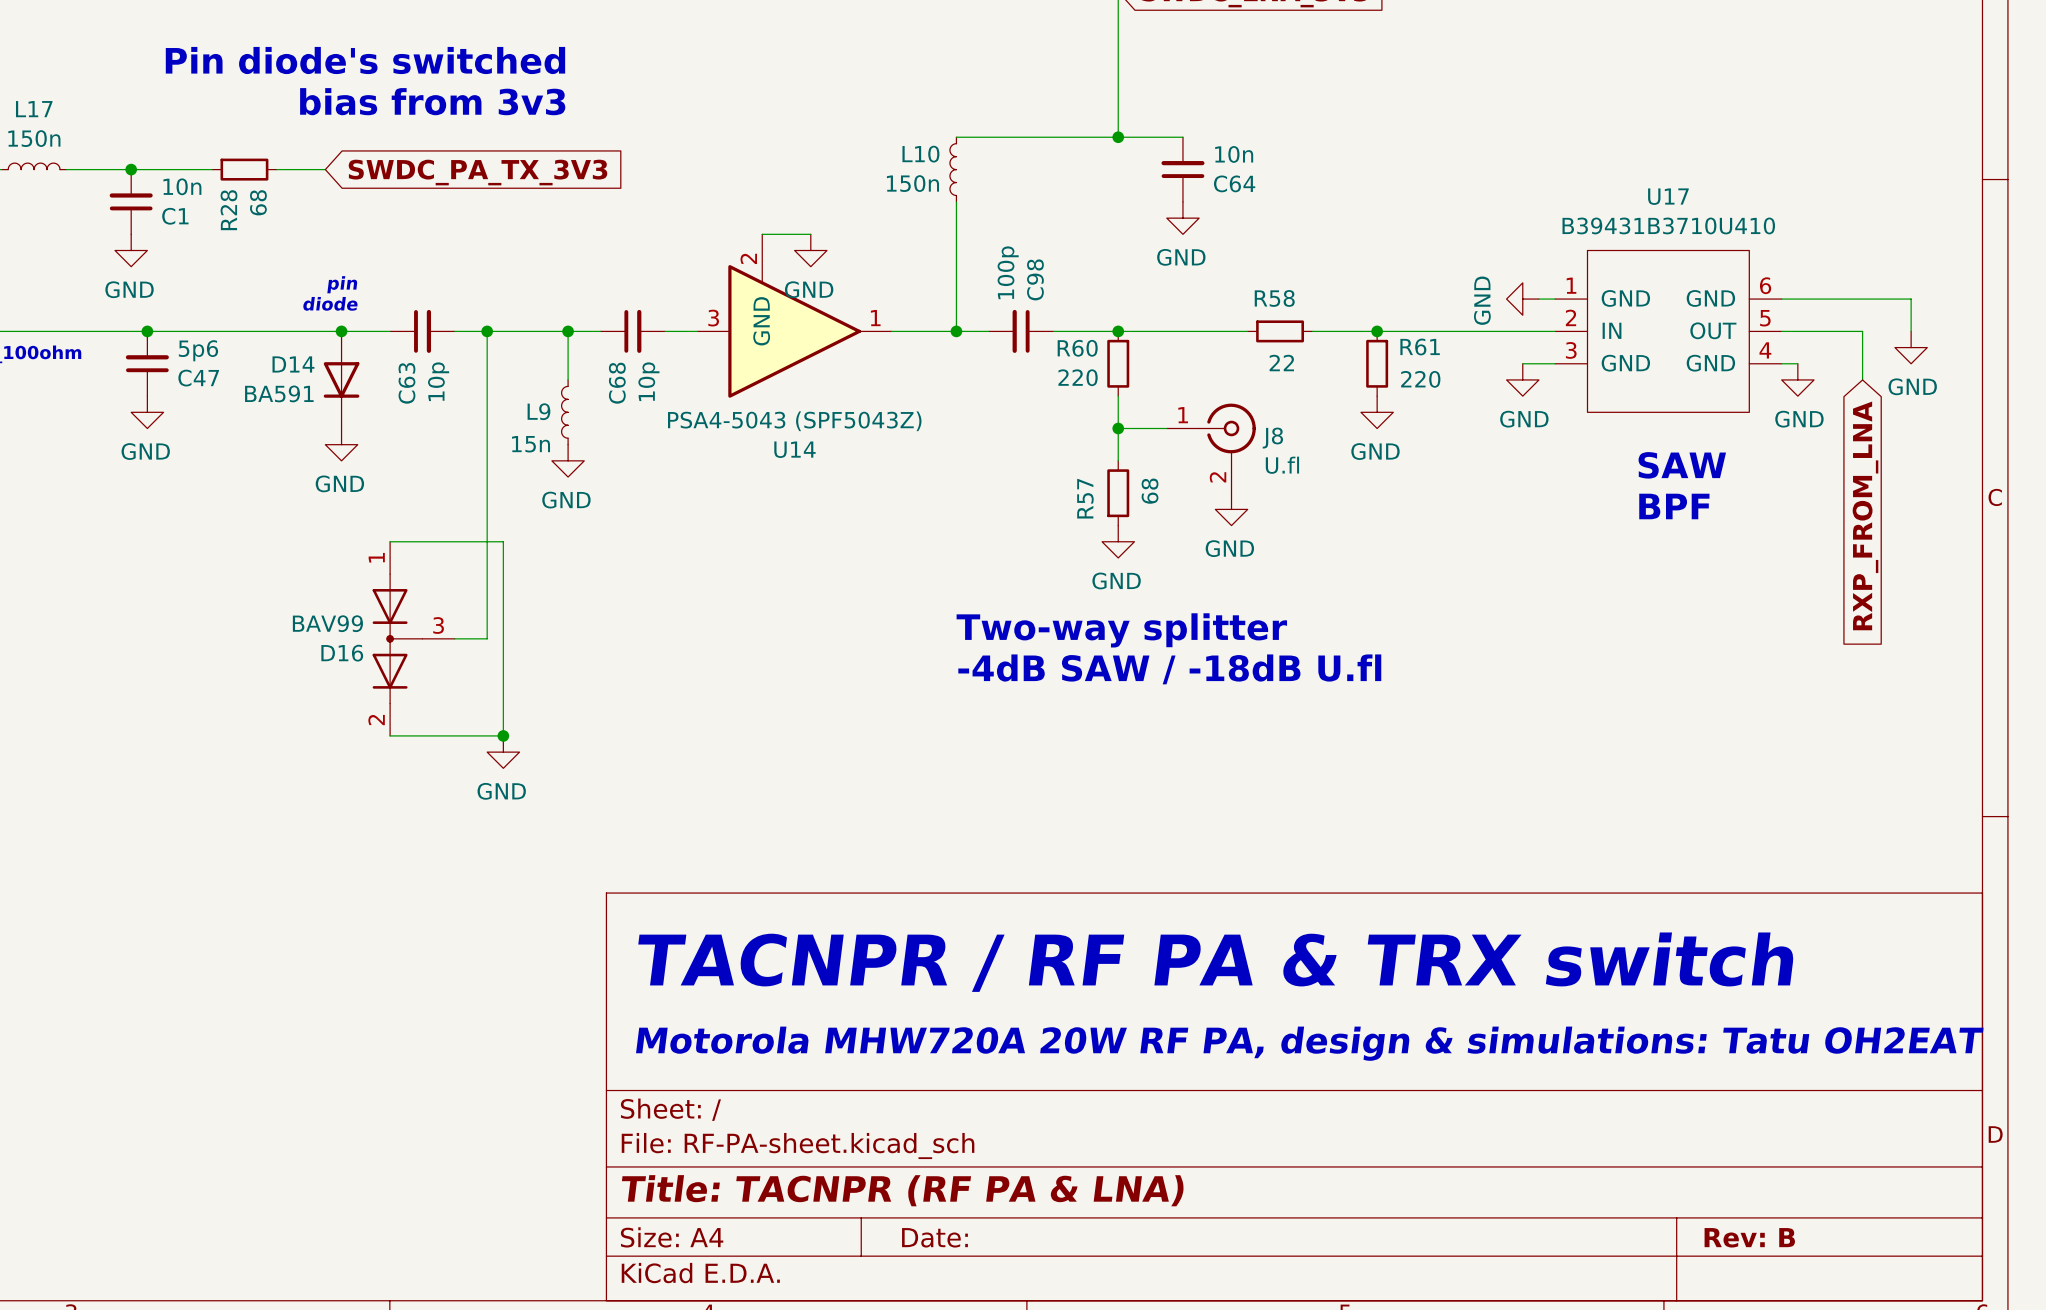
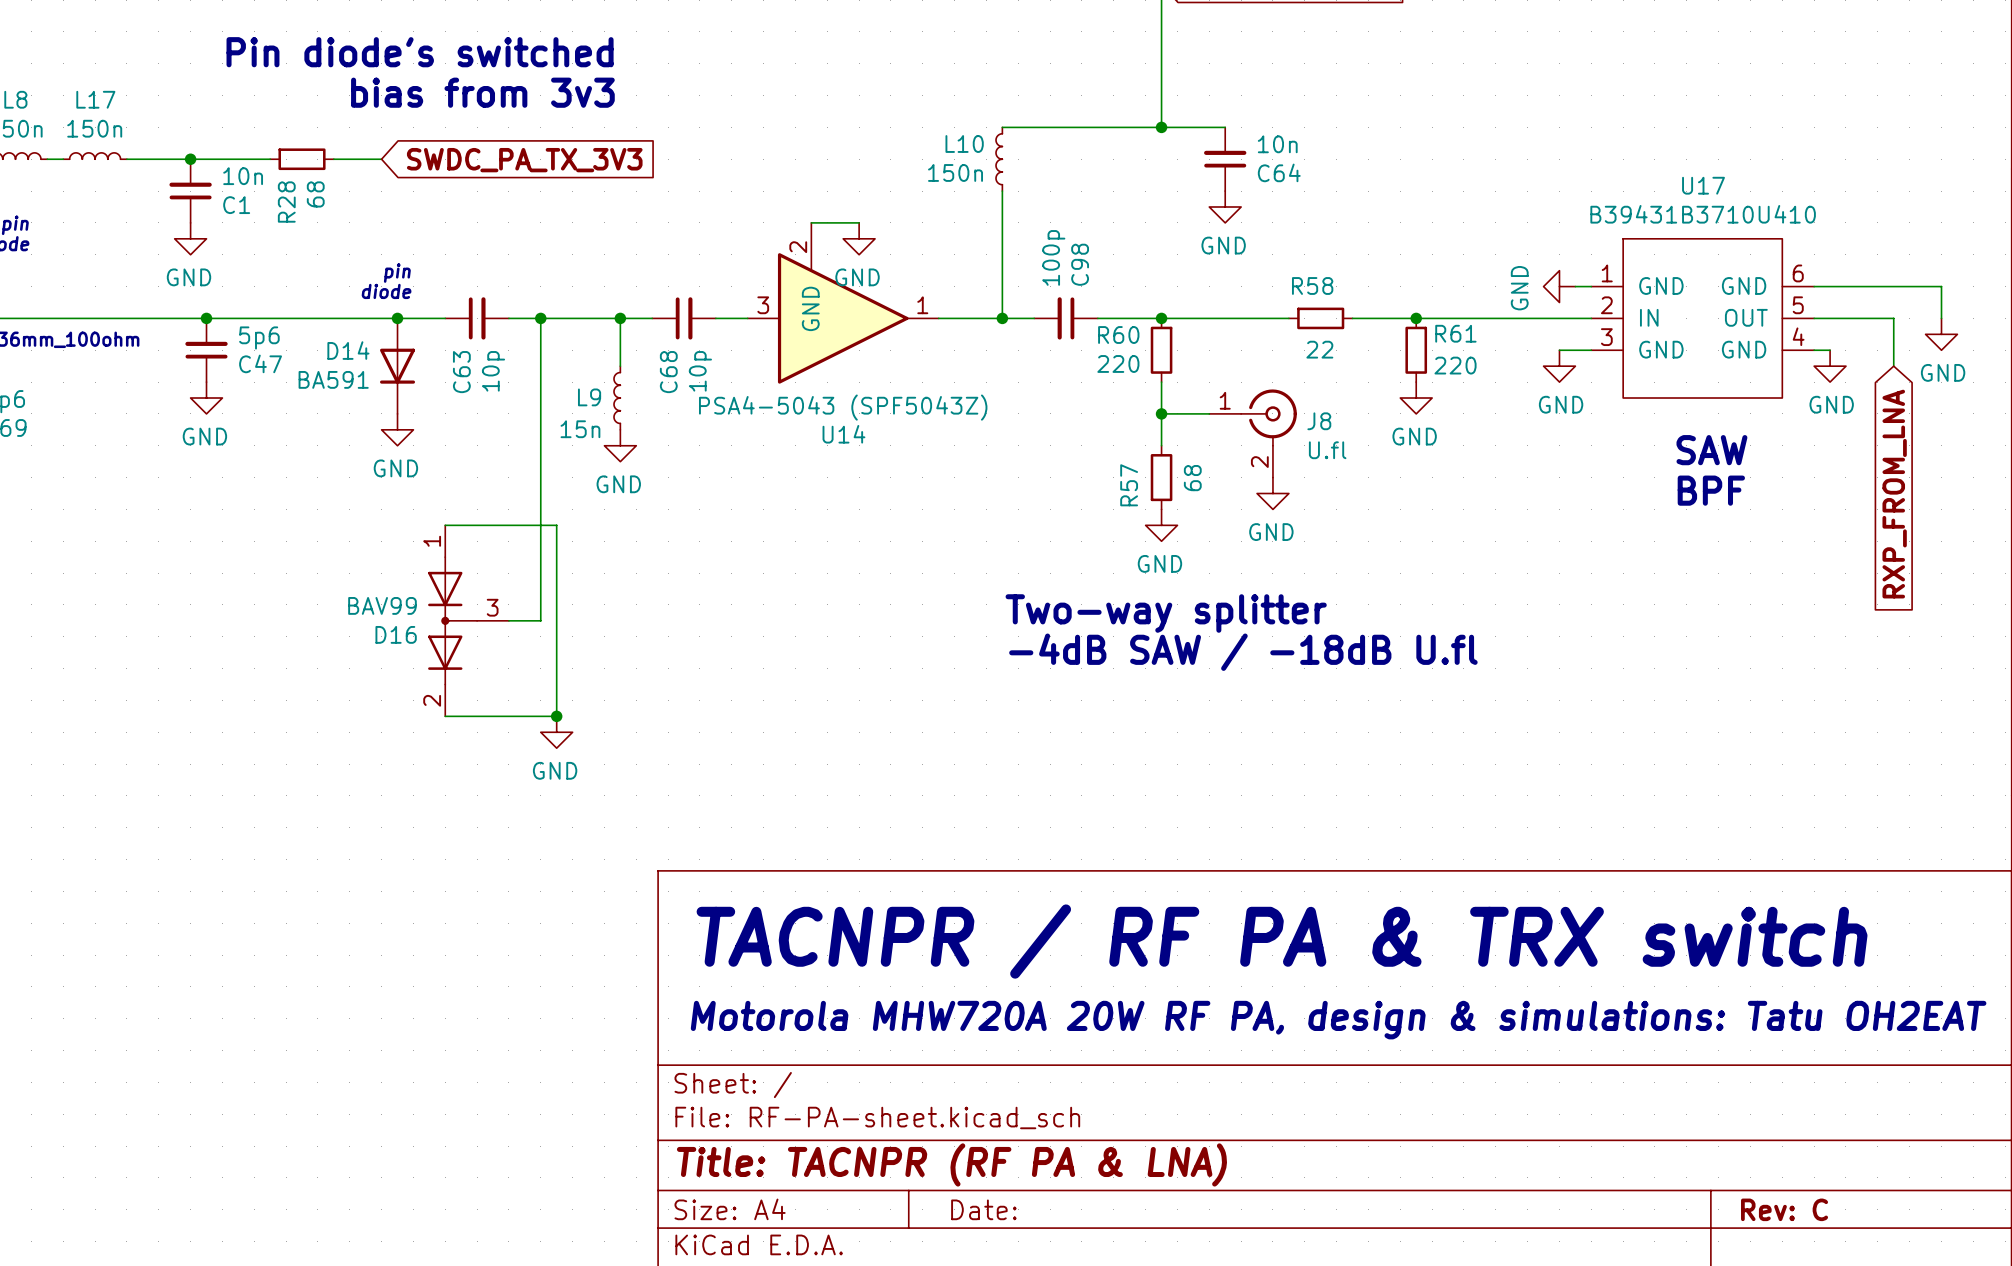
title block: Rev: B (1749, 1237) -> Rev: C (1784, 1209)

